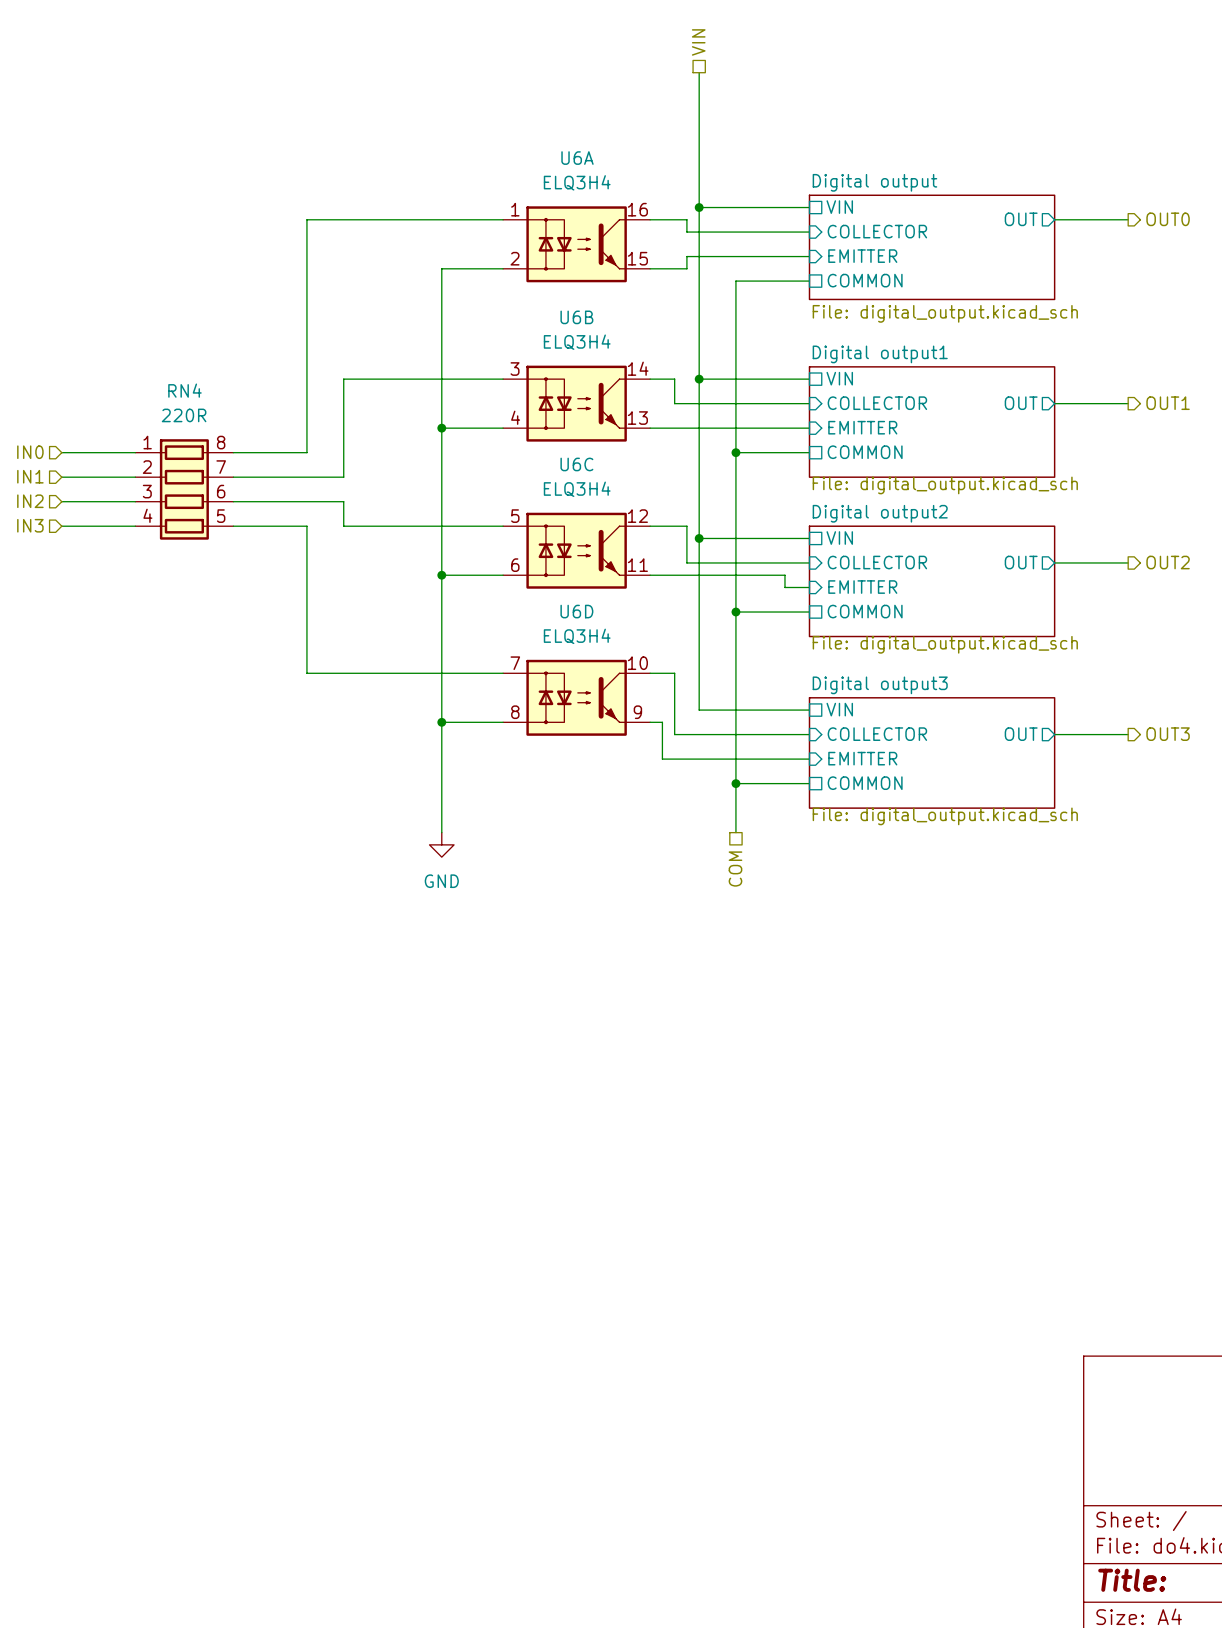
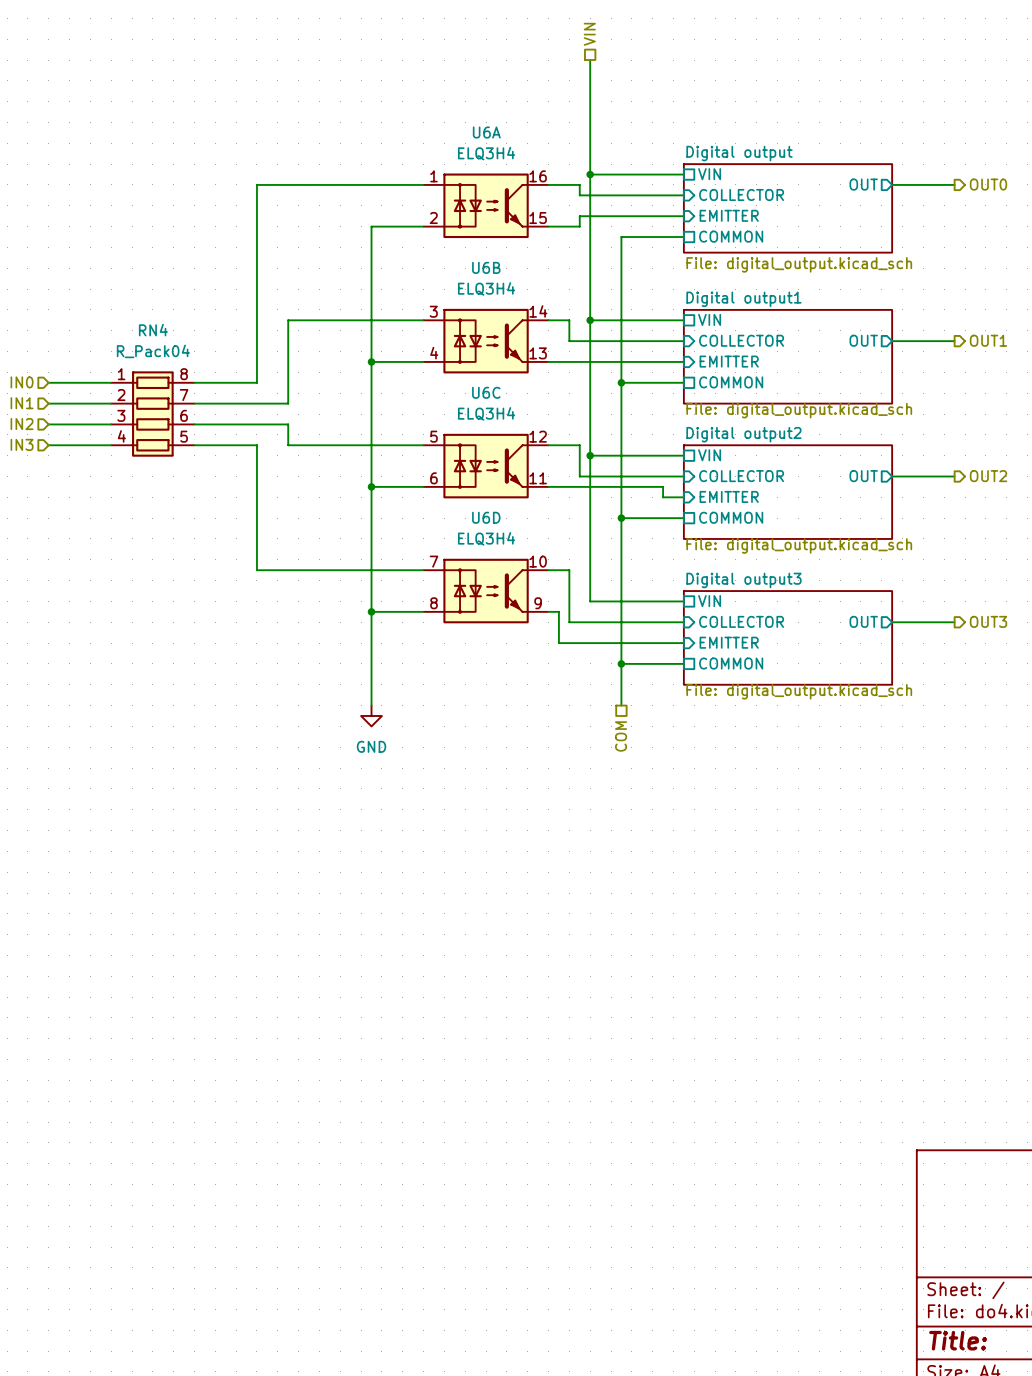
RN4 value: 220R (184, 415) -> R_Pack04 (153, 351)

